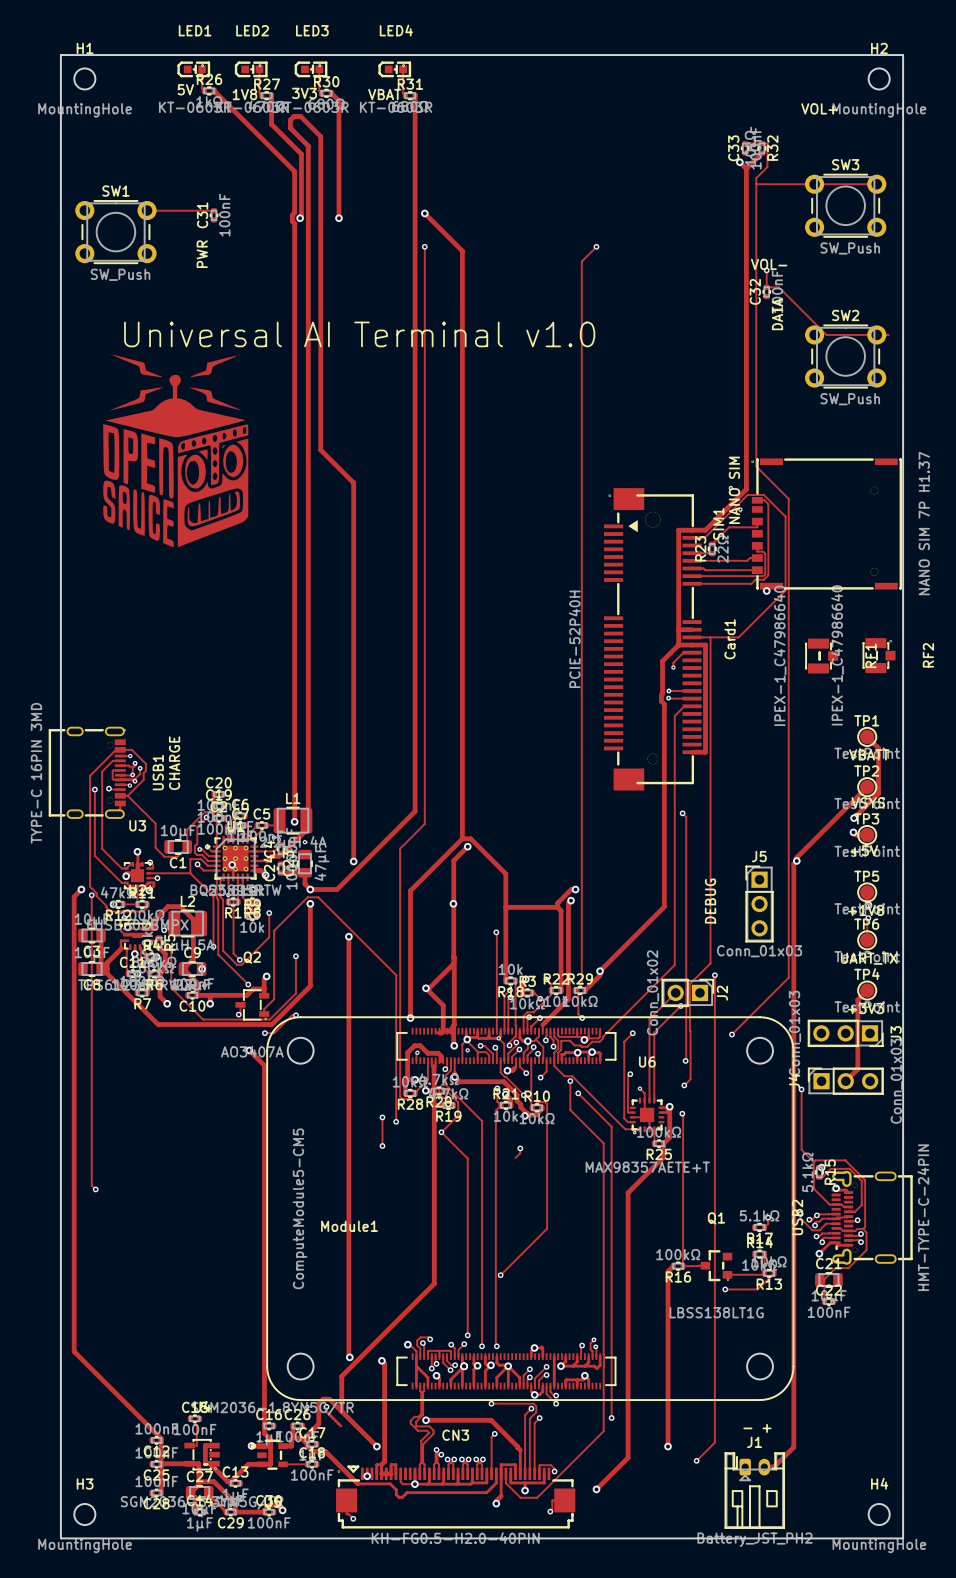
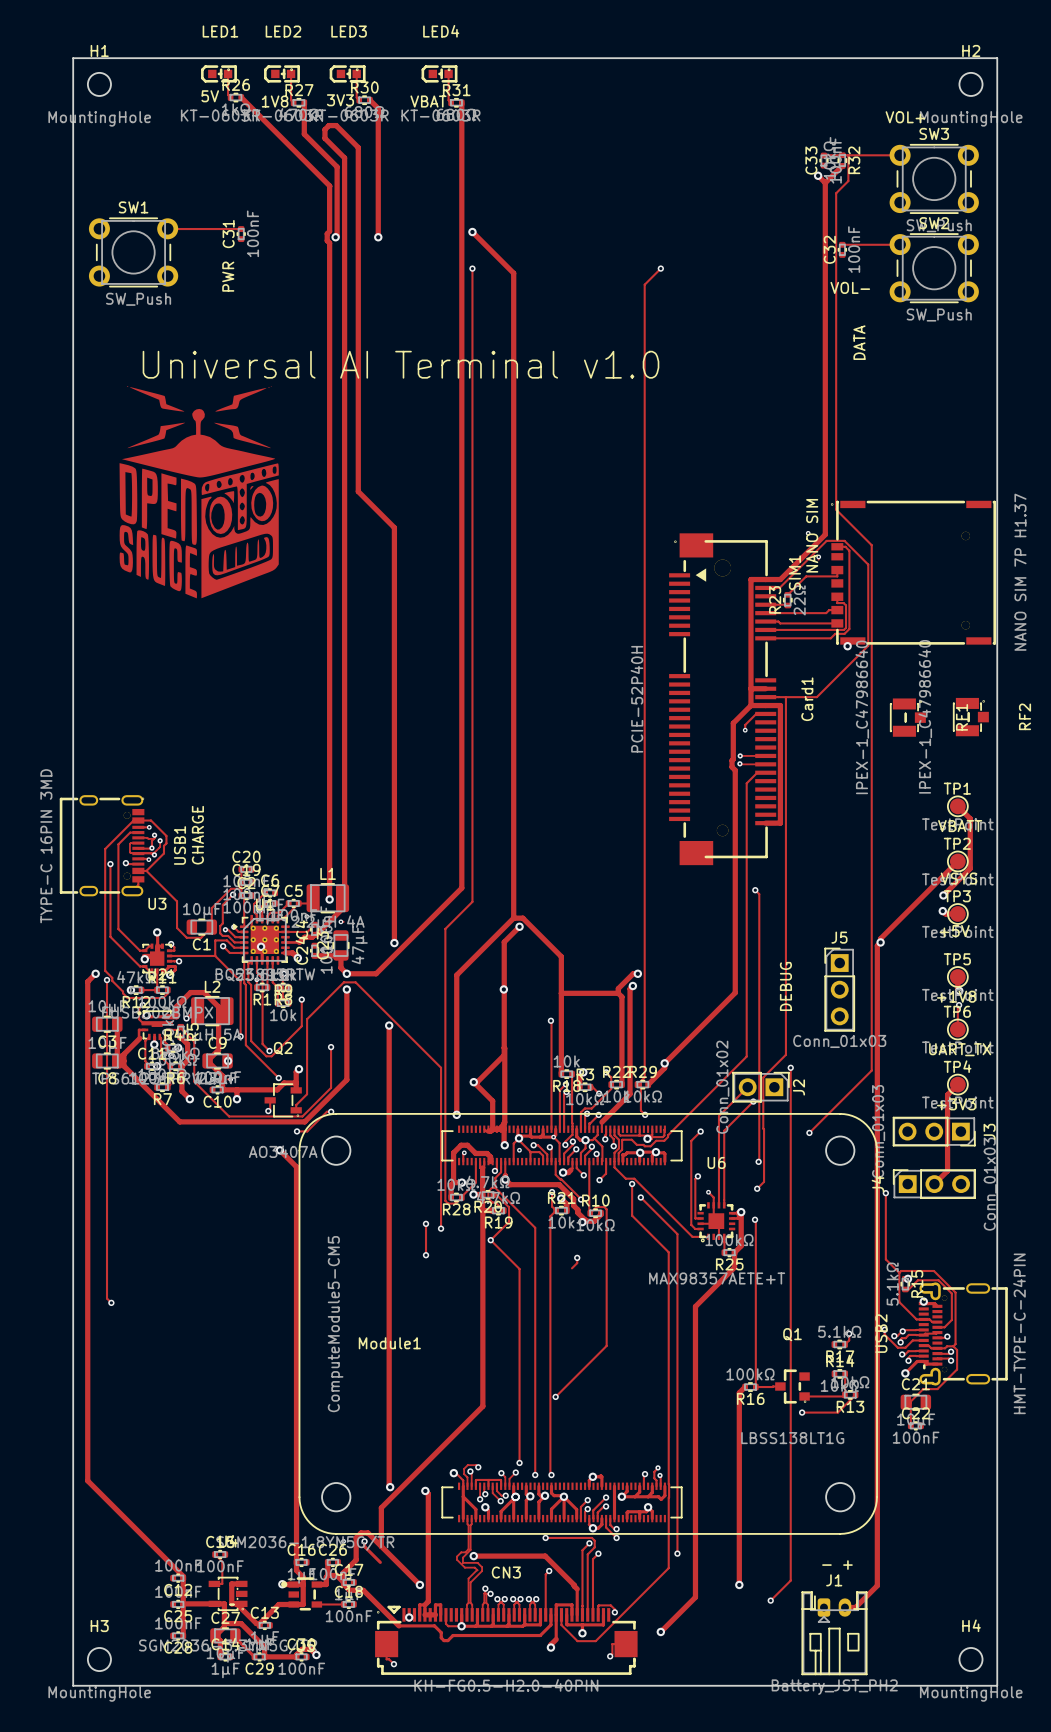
track: none -> (848, 155) (900, 155)
track: (756, 184) (876, 184) -> none
SW3 position: (845, 205) -> (934, 178)
track: none -> (842, 244) (899, 244)
track: (766, 270) (766, 287) (778, 287) (826, 334) (888, 334) -> none
via: (766, 270) -> none
C32 position: (766, 291) -> (842, 249)
SW2 position: (845, 356) -> (934, 268)

